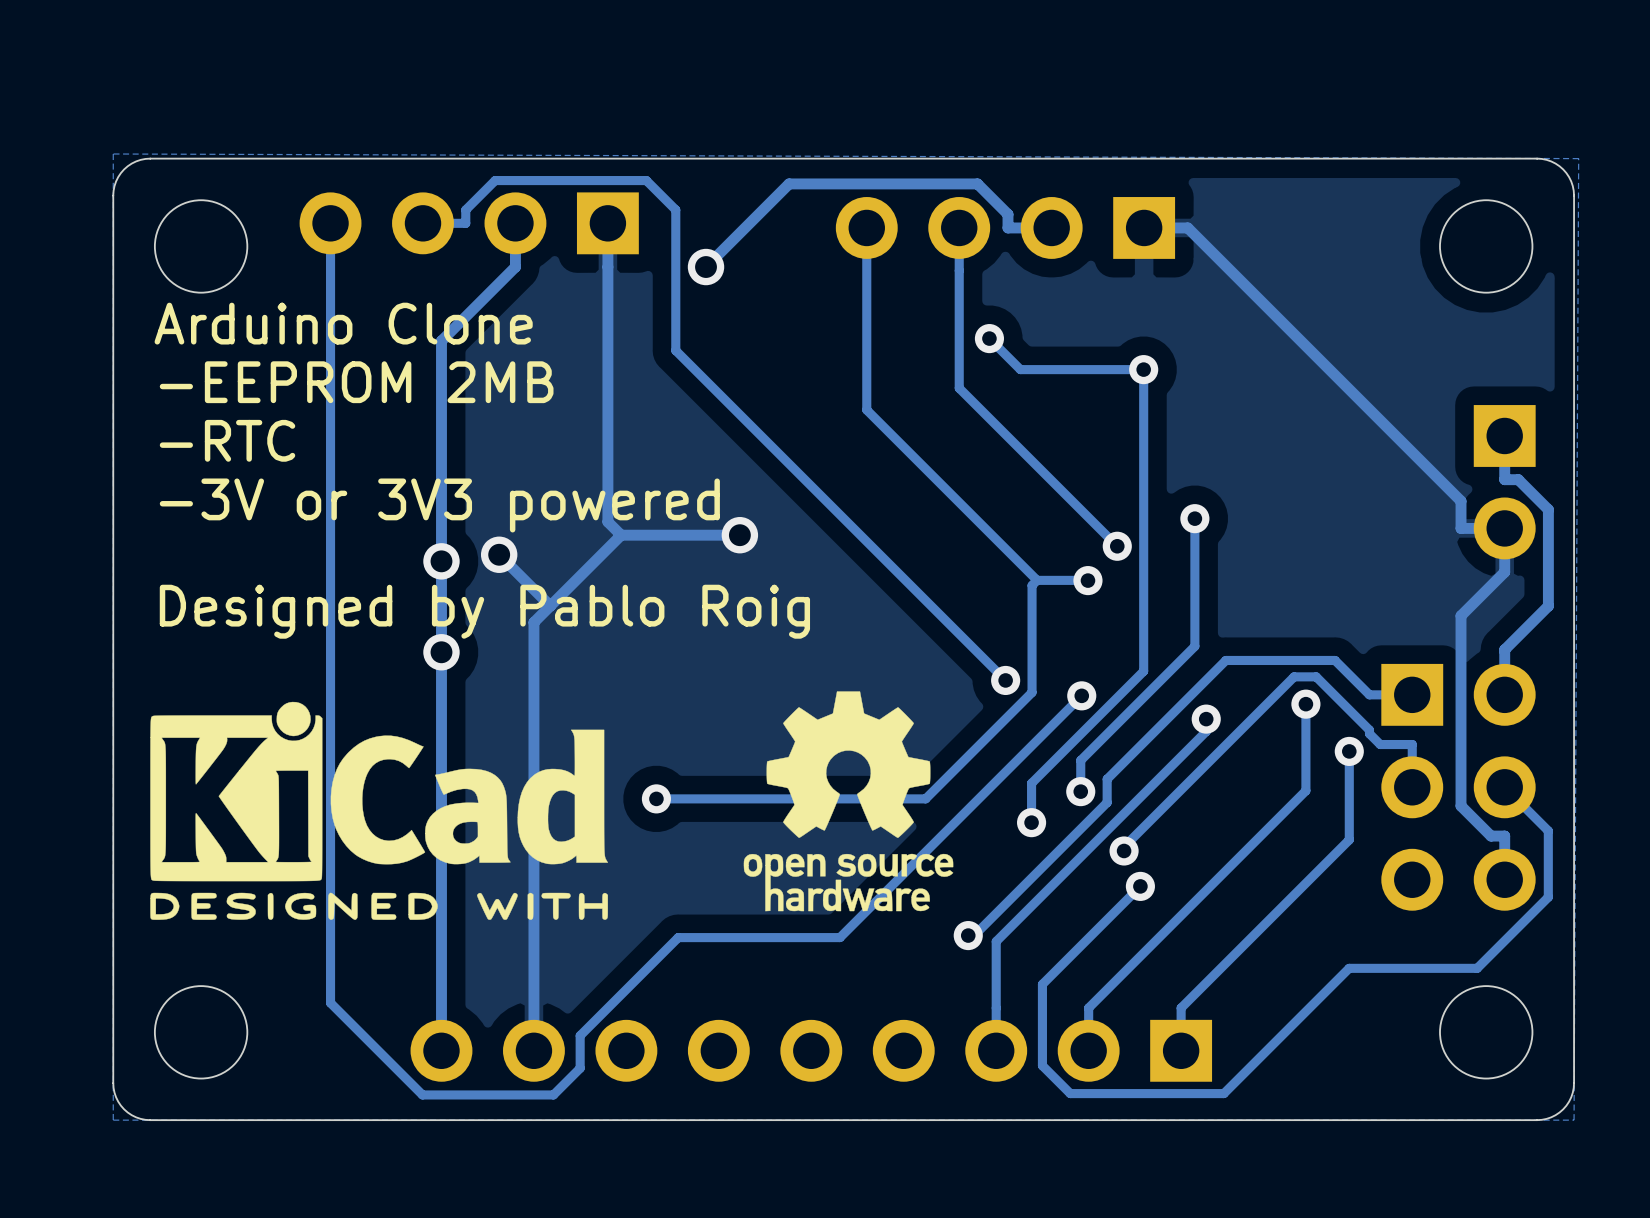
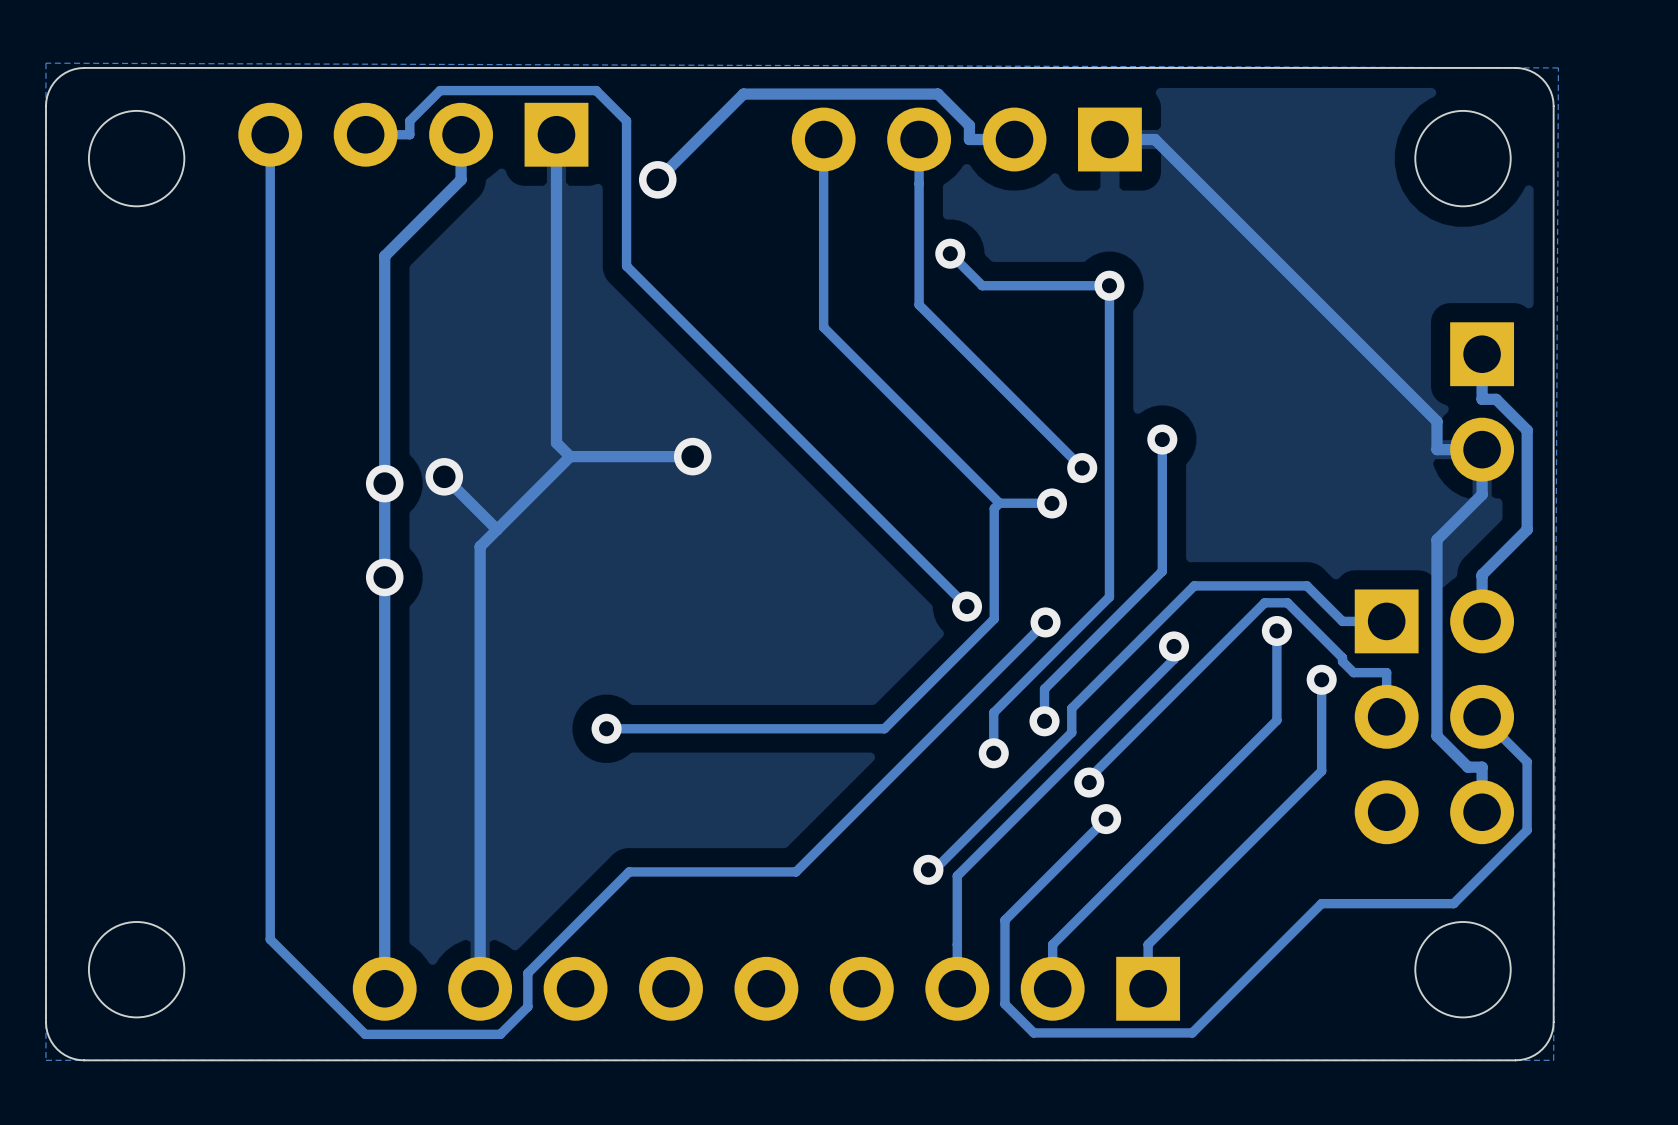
text: Arduino Clone (343, 323) -> none
text: -EEPROM 2MB (356, 382) -> none
text: -RTC (227, 440) -> none
text: -3V or 3V3 powered (439, 505) -> none
text: Designed by Pablo Roig (484, 611) -> none
drawing: [743, 691, 954, 912] -> none
drawing: [150, 701, 608, 920] -> none

